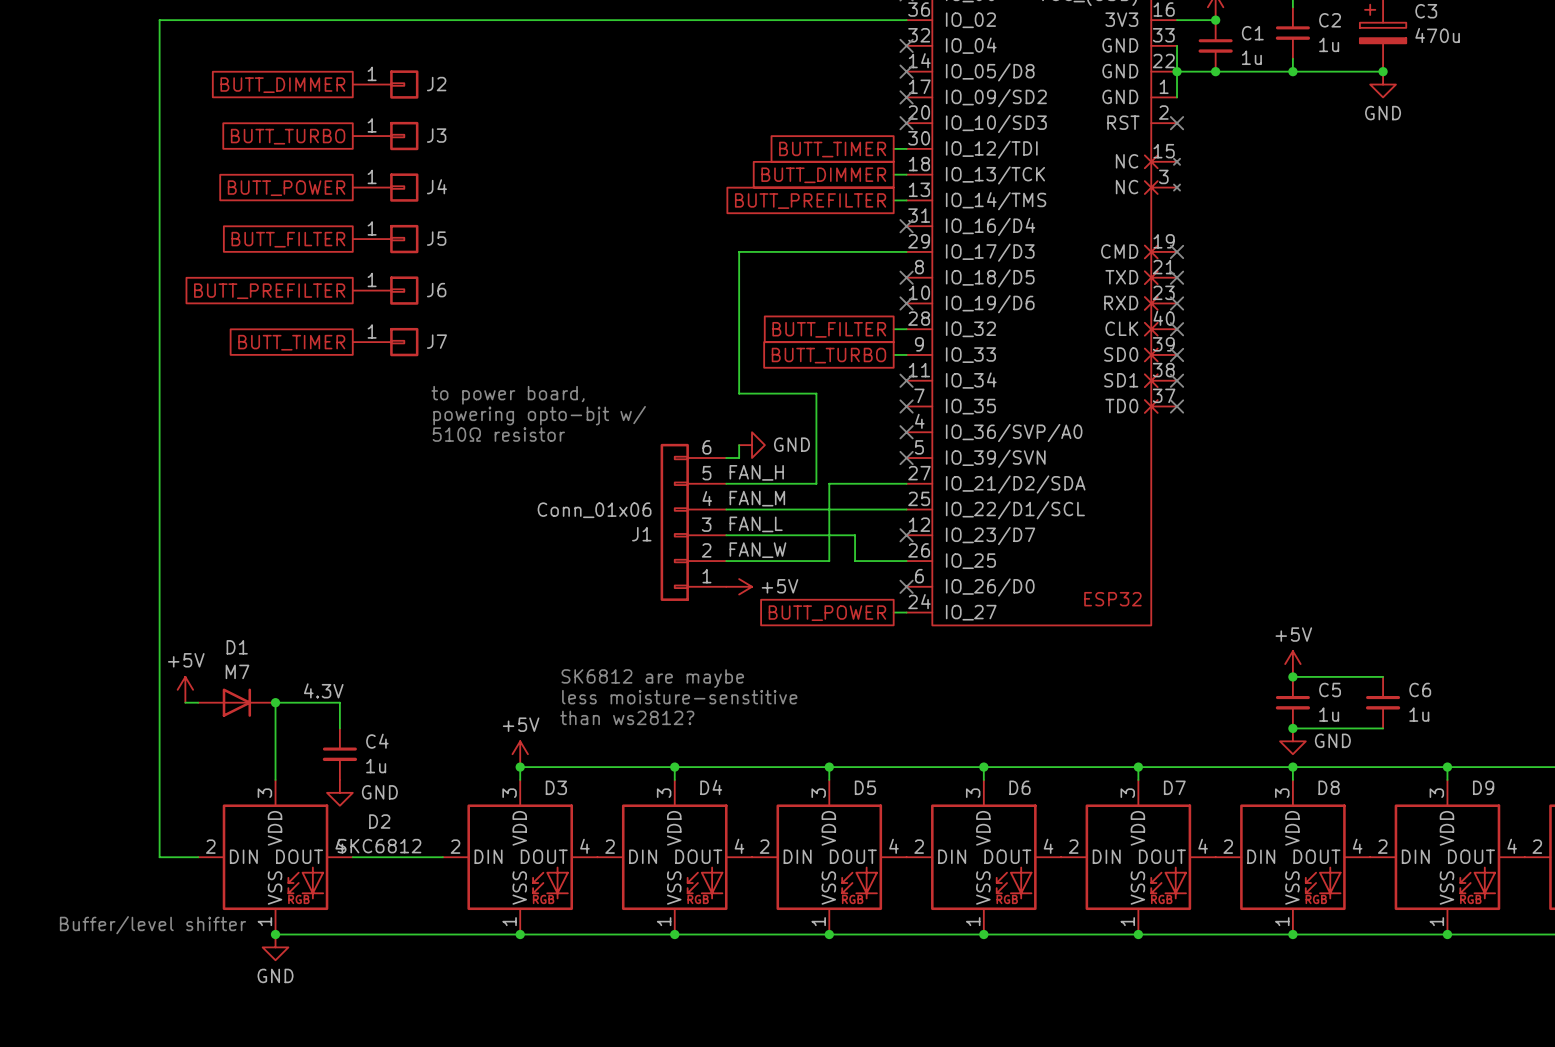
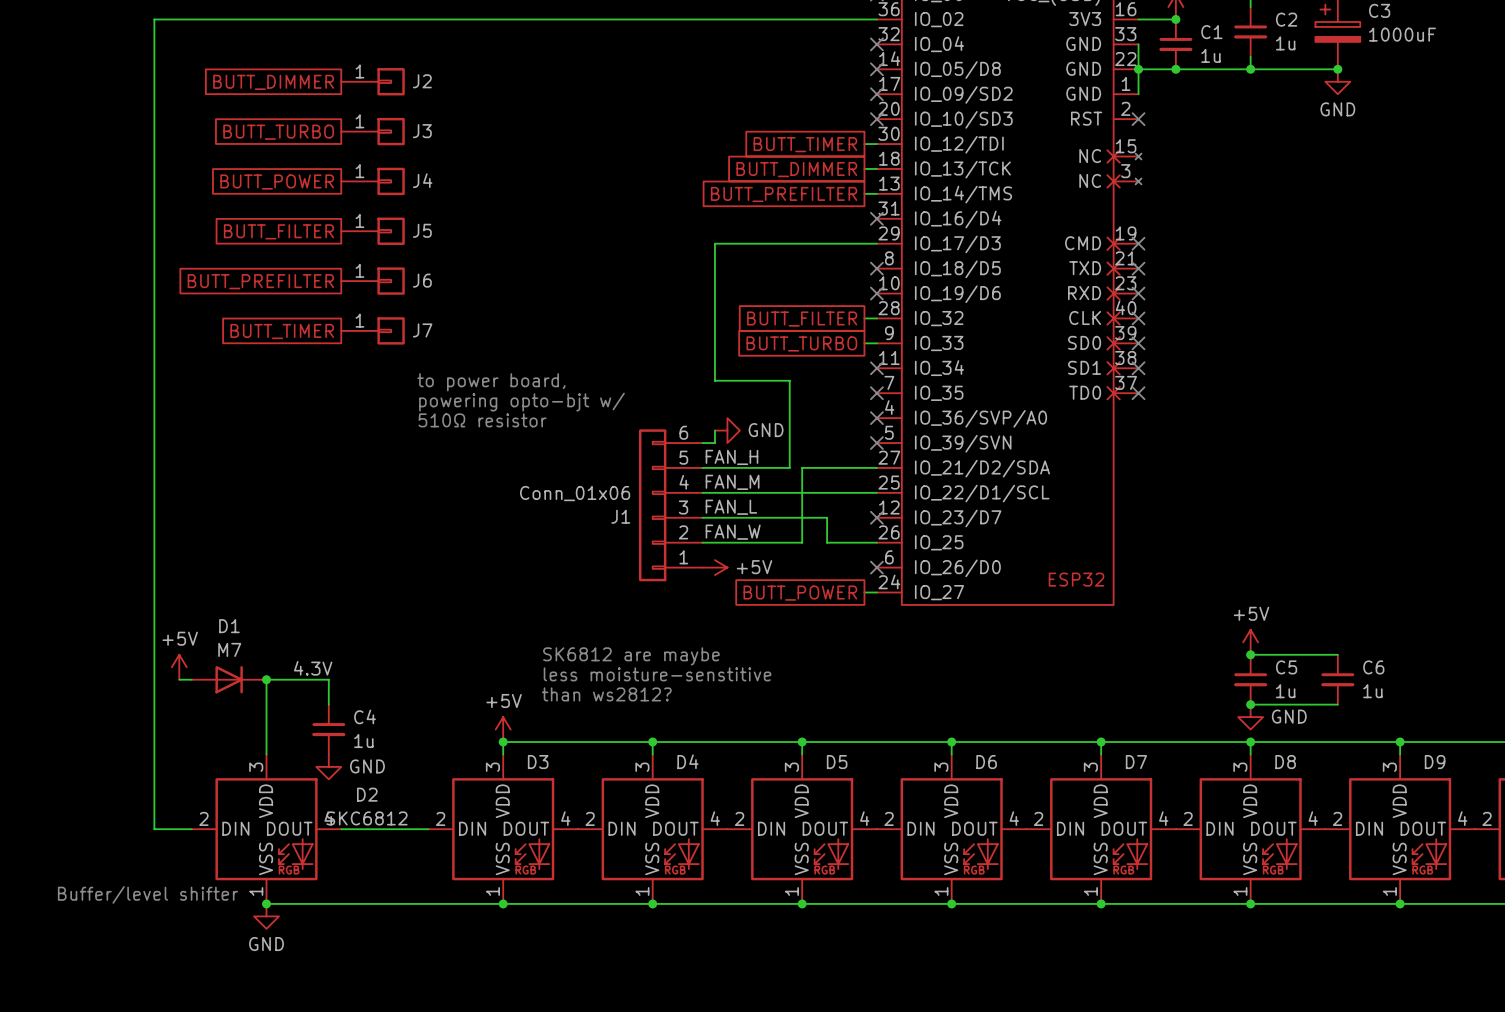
C3 value: 470u (1437, 35) -> 1000uF (1402, 34)

